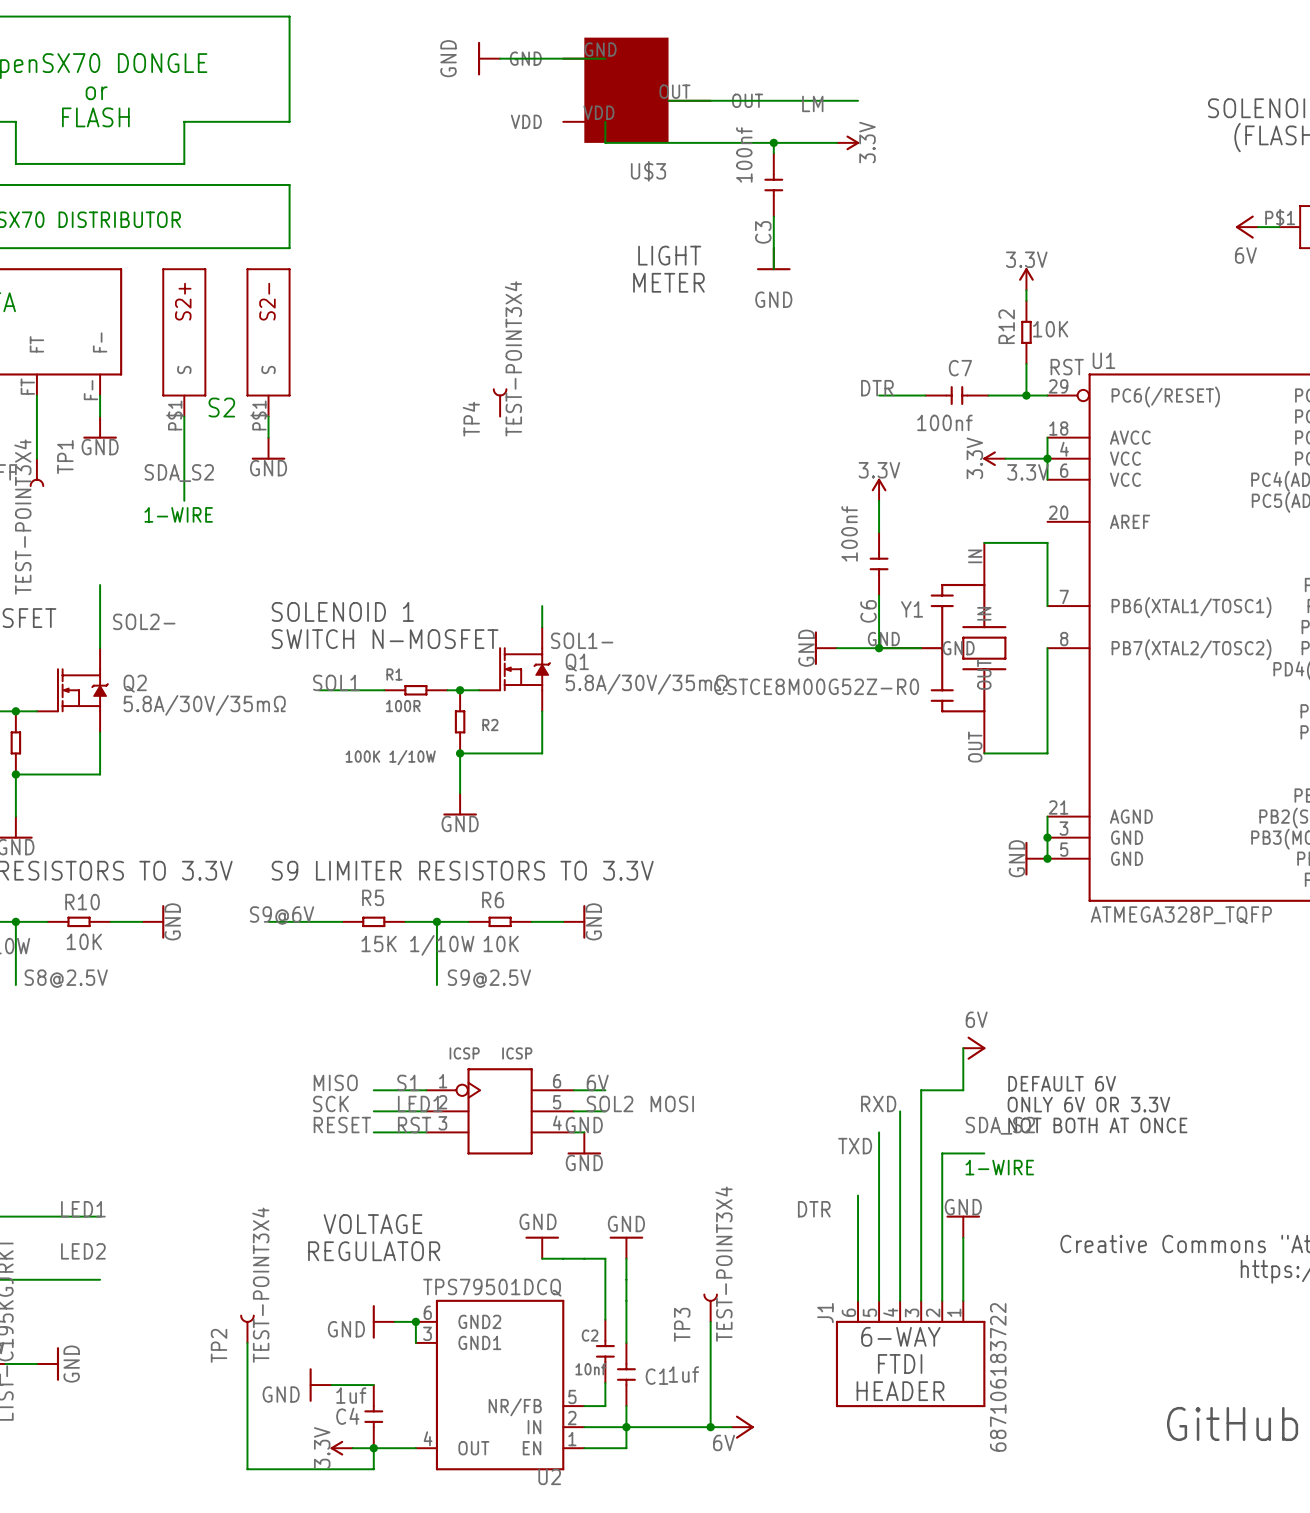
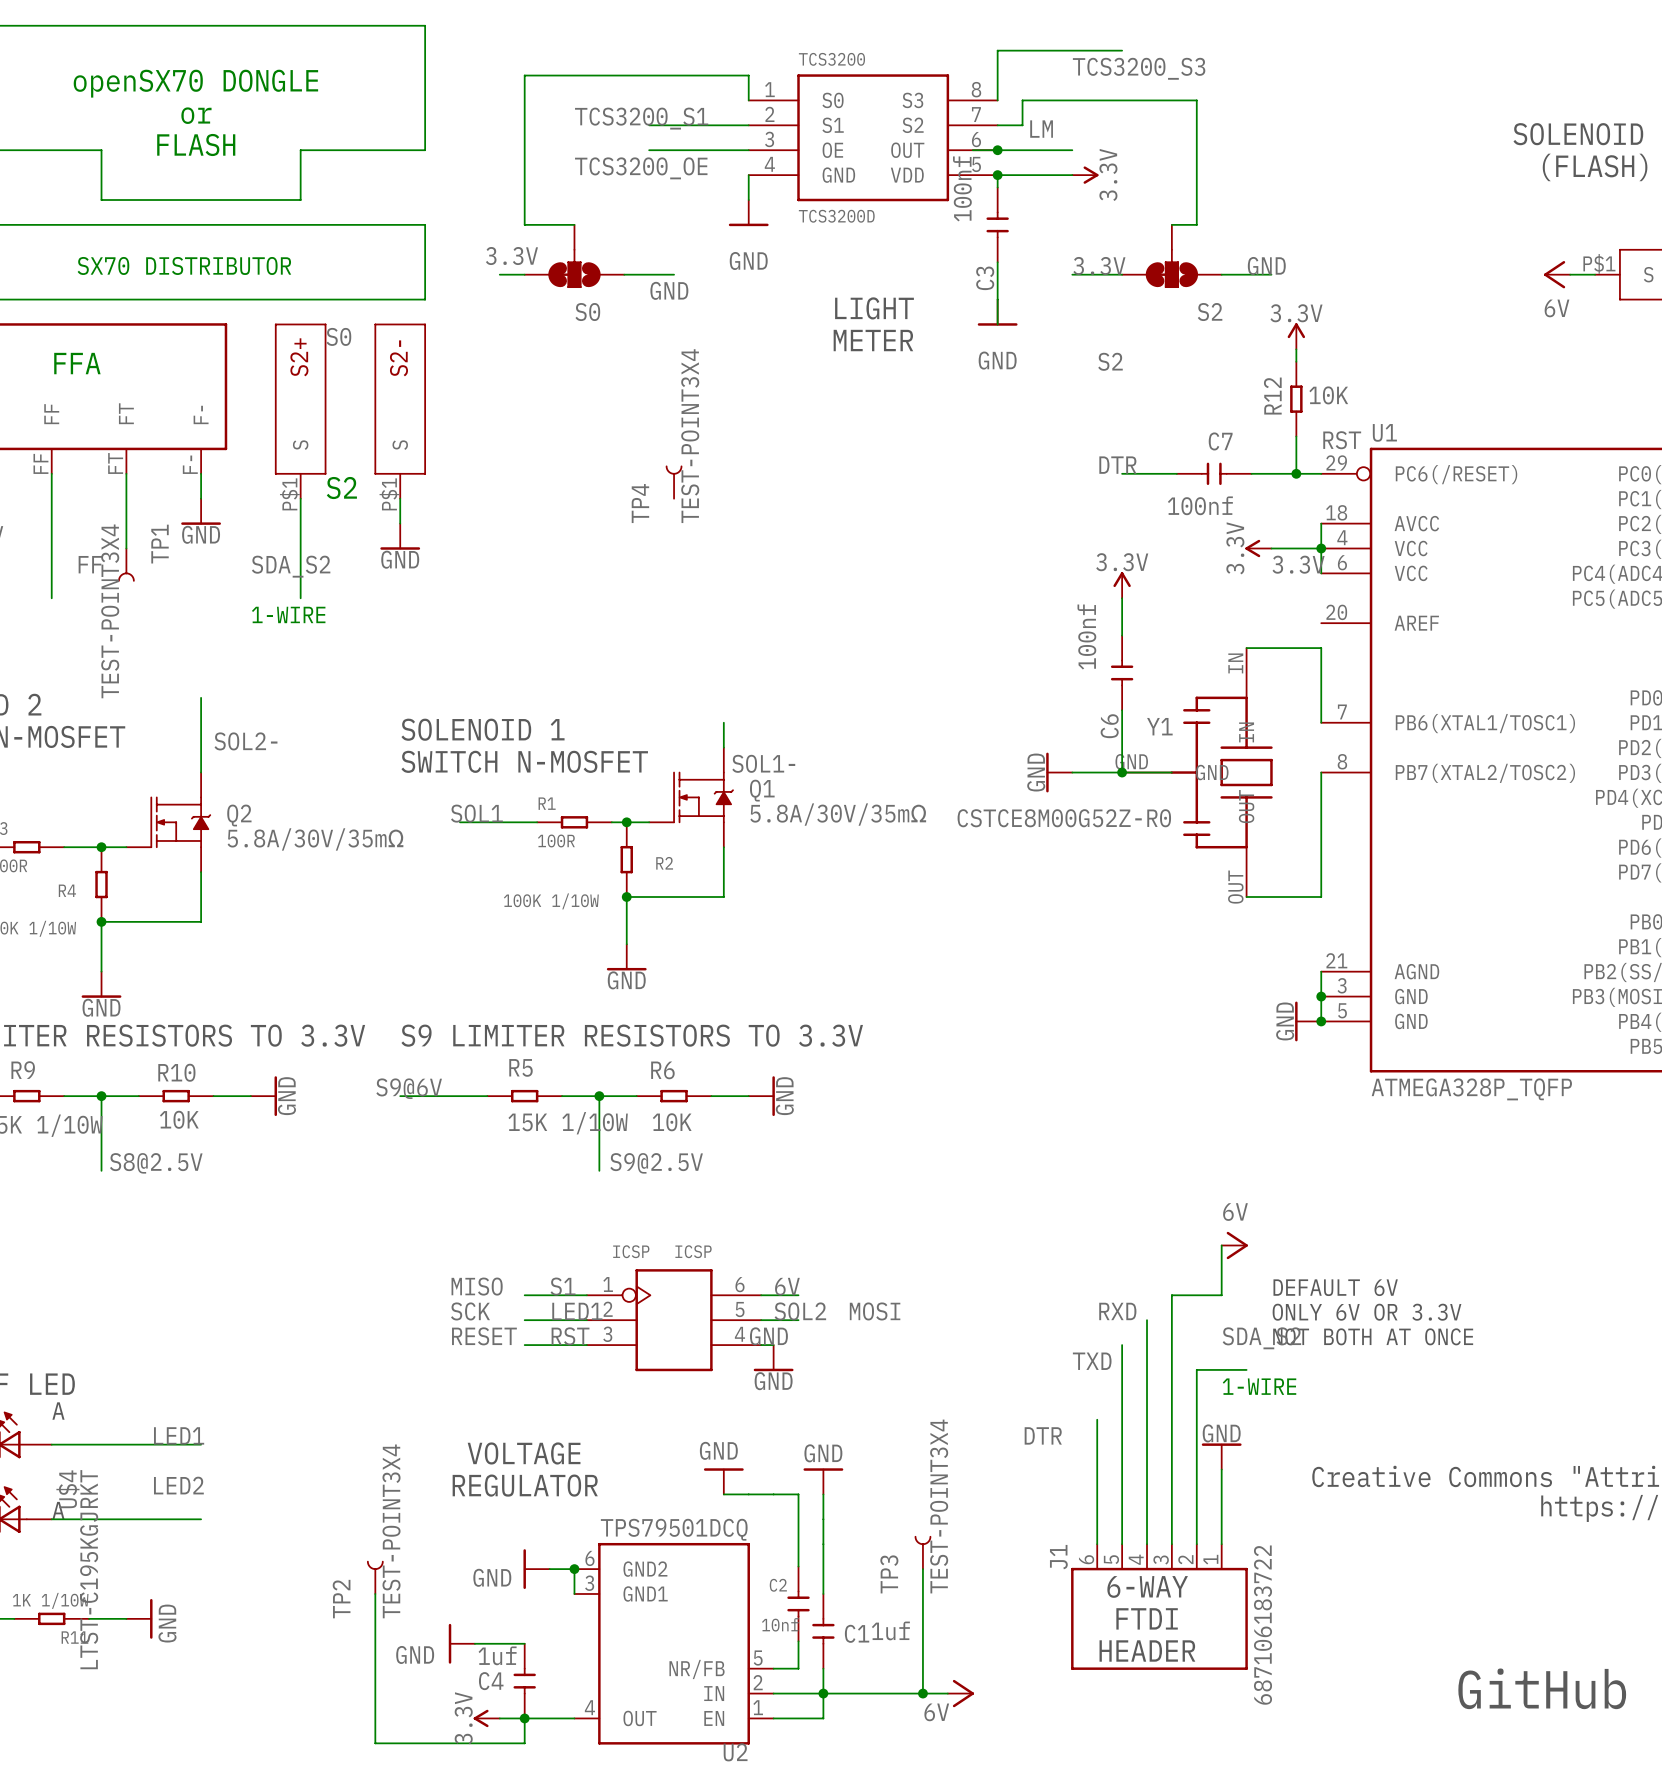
wire: none -> (1122, 50) (997, 50) (997, 100)
label: none -> TCS3200_S3 (1139, 68)
power symbol rotation: 0° (479, 58) -> 90° counterclockwise (748, 224)
power symbol position: GND (489, 58) -> GND (748, 213)
wire: none -> (674, 75) (524, 75) (524, 224) (574, 224)
wire: (563, 58) (605, 58) -> (748, 75) (748, 100)
U$3: (636, 90) -> none
label: none -> TCS3200_S1 (641, 118)
wire: none -> (649, 125) (748, 125)
wire: (668, 100) (773, 100) -> none
wire: (794, 100) (858, 100) -> (1022, 125) (1022, 100) (1196, 100) (1196, 224) (1171, 224)
TCS3200: none -> TCS3200D (873, 137)
wire: none -> (649, 150) (748, 150)
wire: (605, 121) (605, 142) (773, 142) -> none
wire: none -> (972, 150) (1072, 150)
junction: none -> (997, 150)
label: none -> TCS3200_OE (641, 168)
wire: none -> (748, 175) (748, 200)
label: none -> 3.3V (511, 256)
S0: none -> S0 (574, 256)
S2: none -> S2 (1171, 256)
label: none -> 3.3V (1099, 265)
label: none -> GND (1266, 265)
wire: none -> (499, 274) (524, 274)
wire: none -> (624, 274) (674, 274)
wire: none -> (1072, 274) (1122, 274)
wire: none -> (1221, 274) (1271, 274)
label: none -> GND (669, 290)

